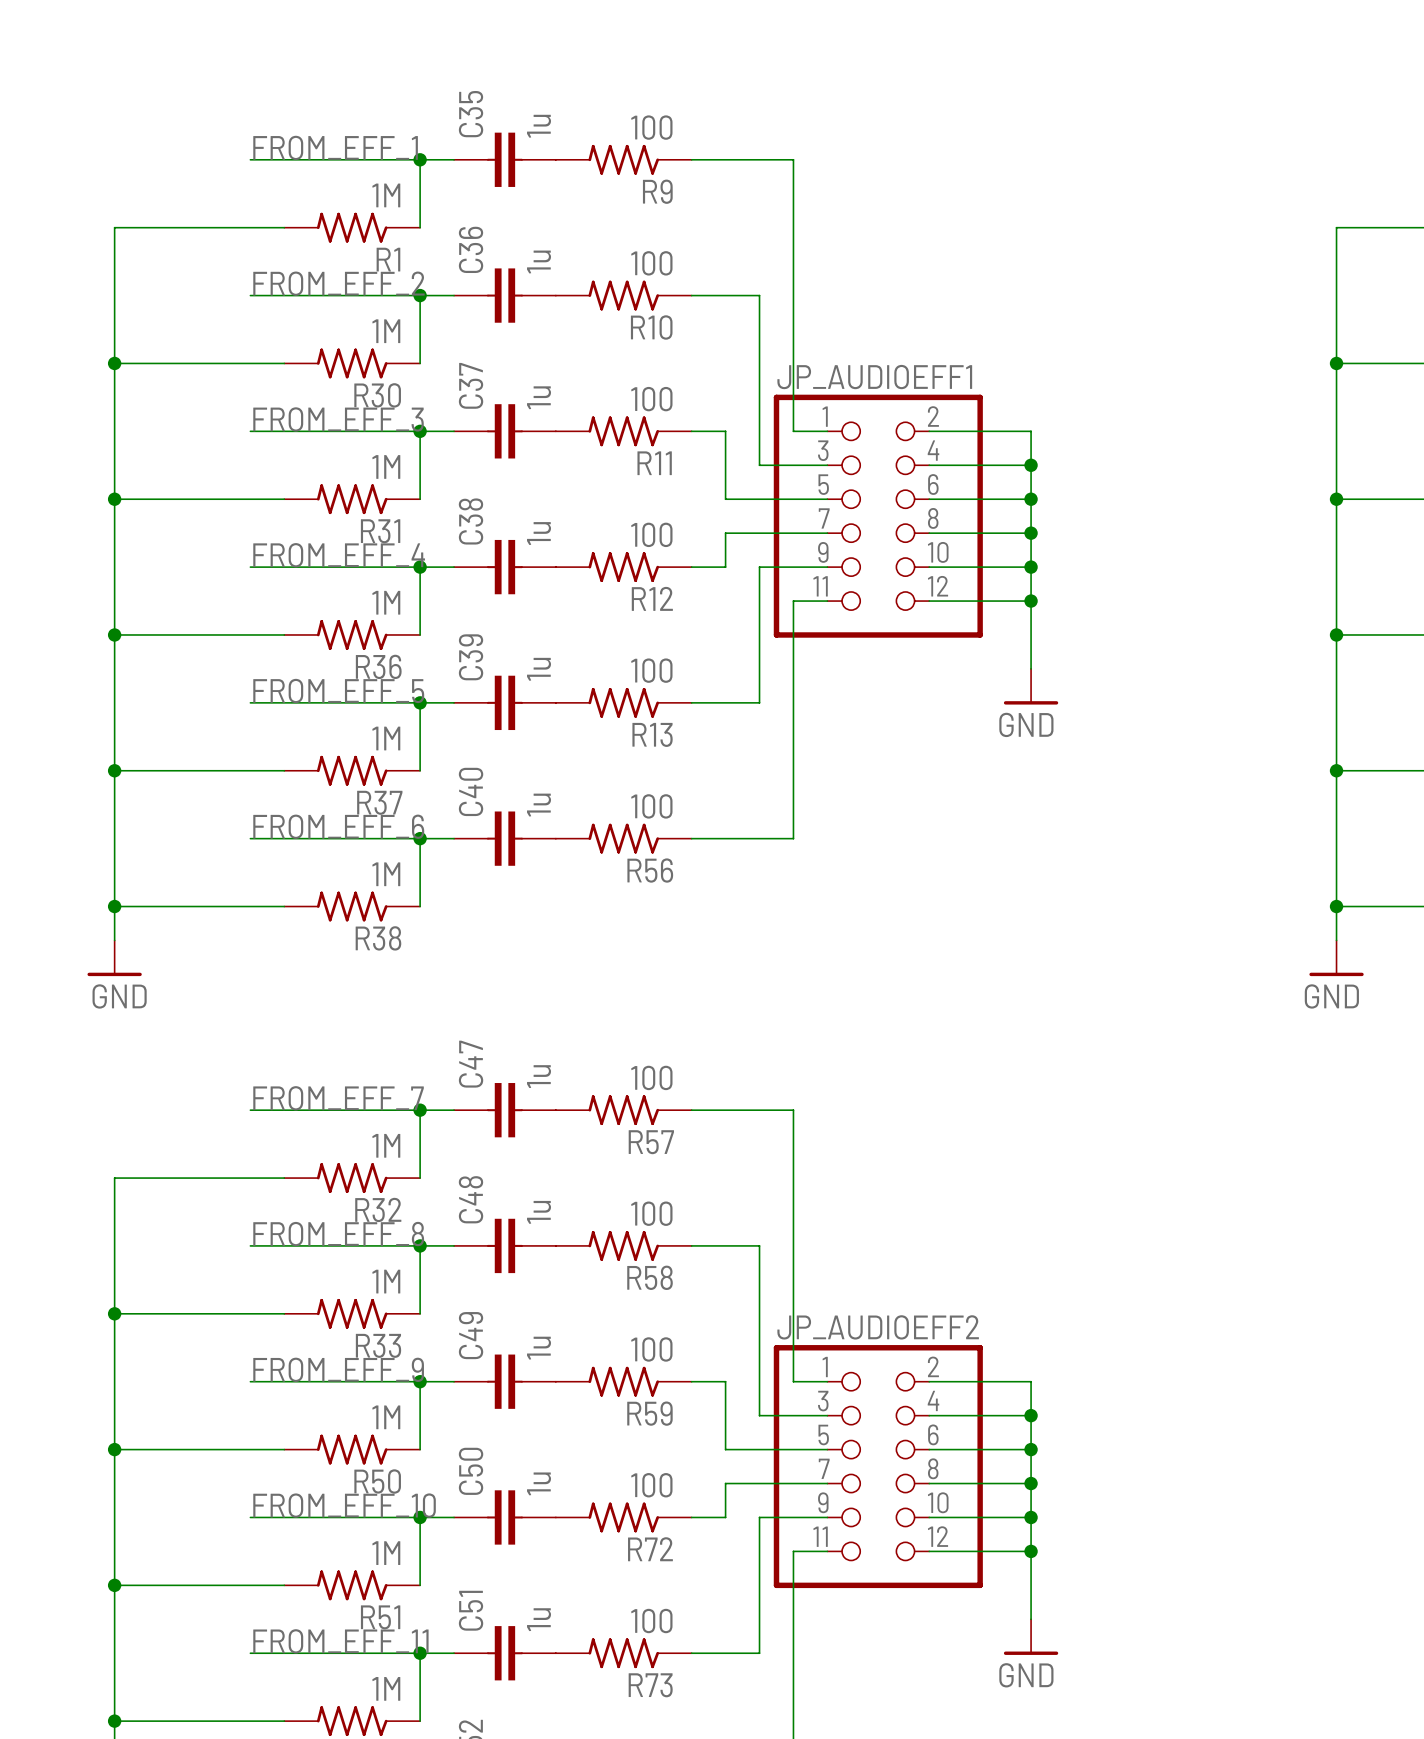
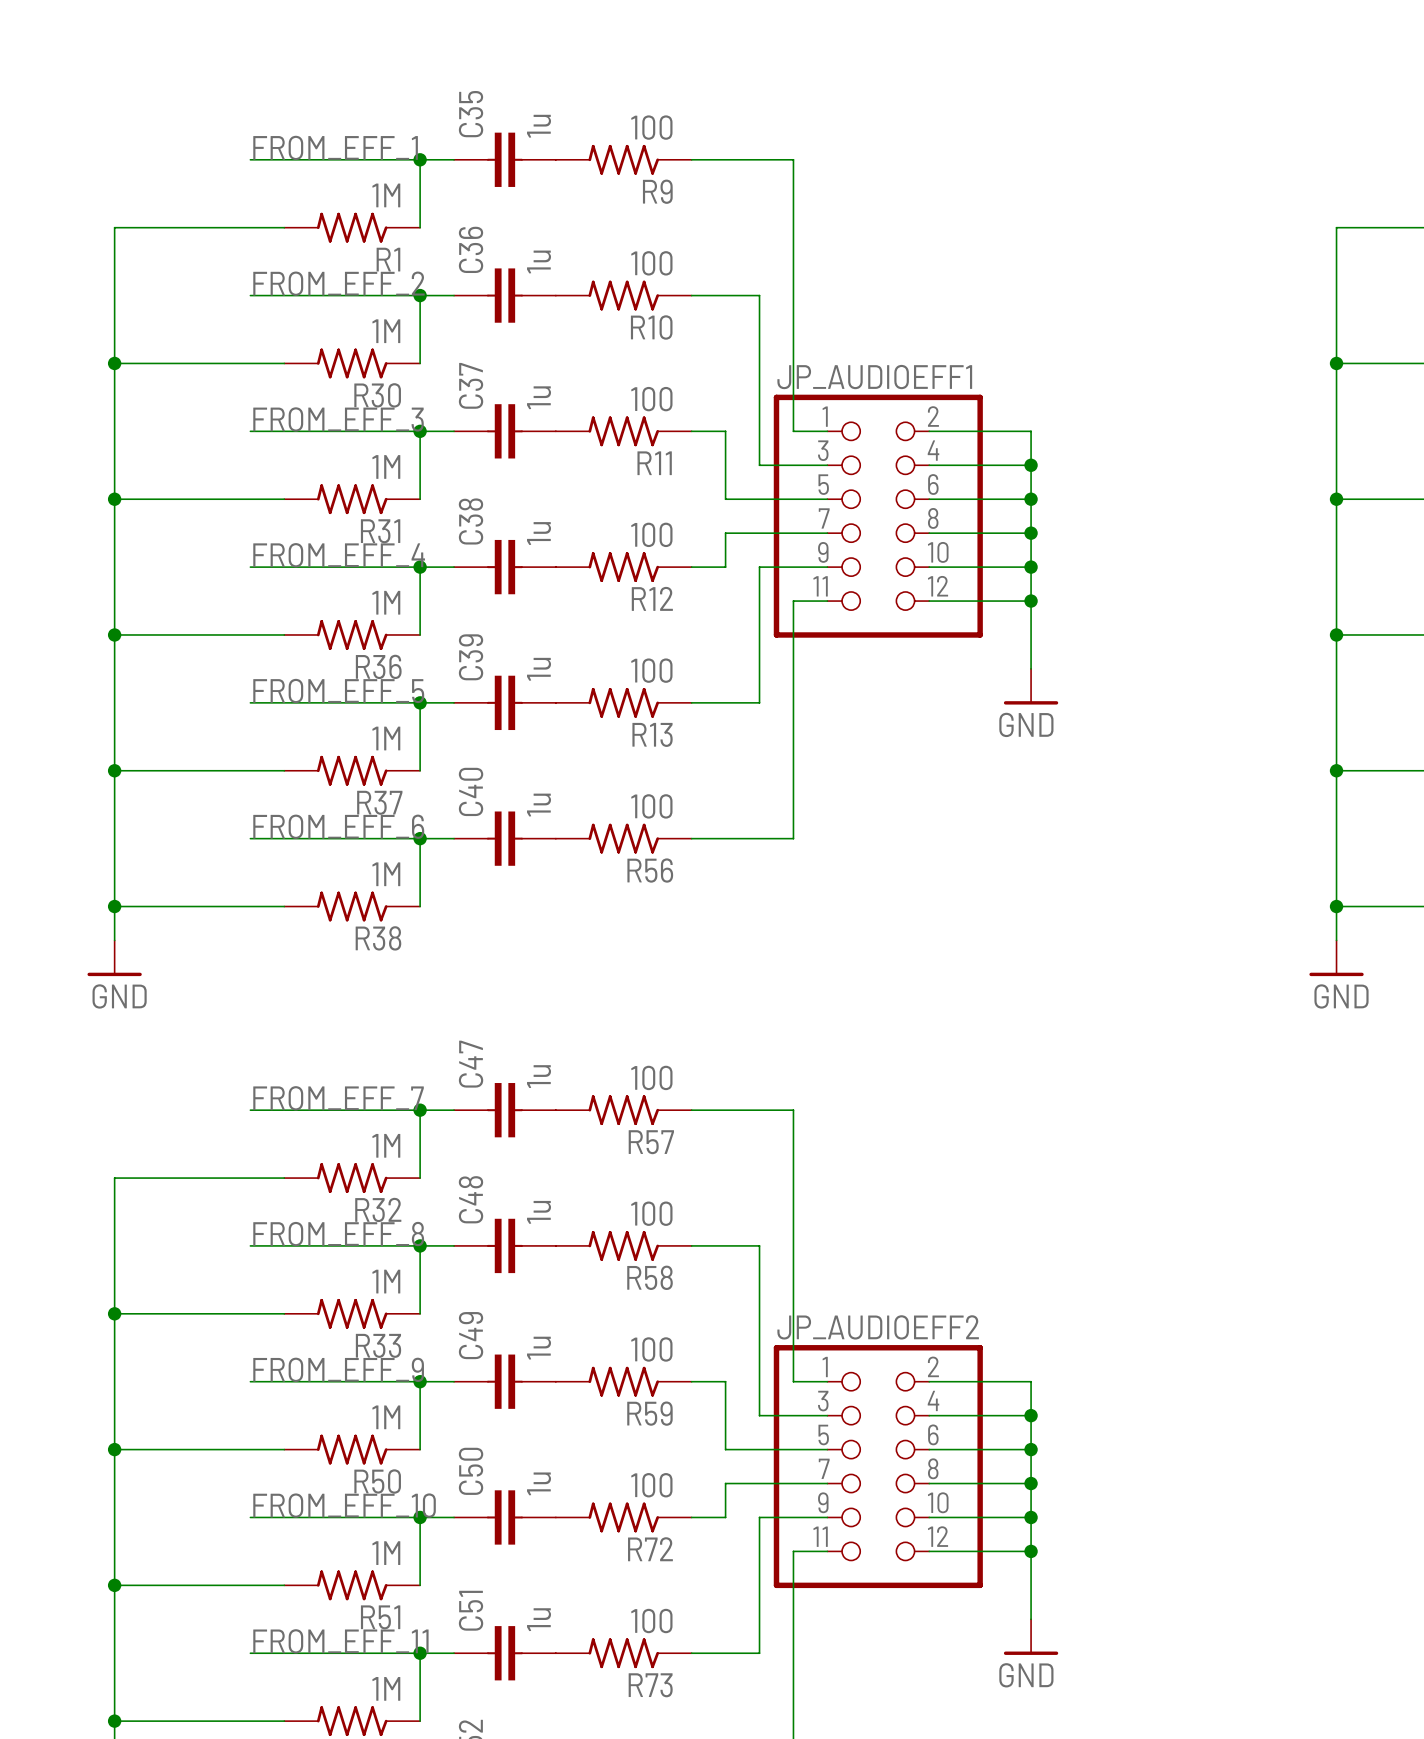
power symbol text position: GND (1331, 996) -> GND (1341, 996)

